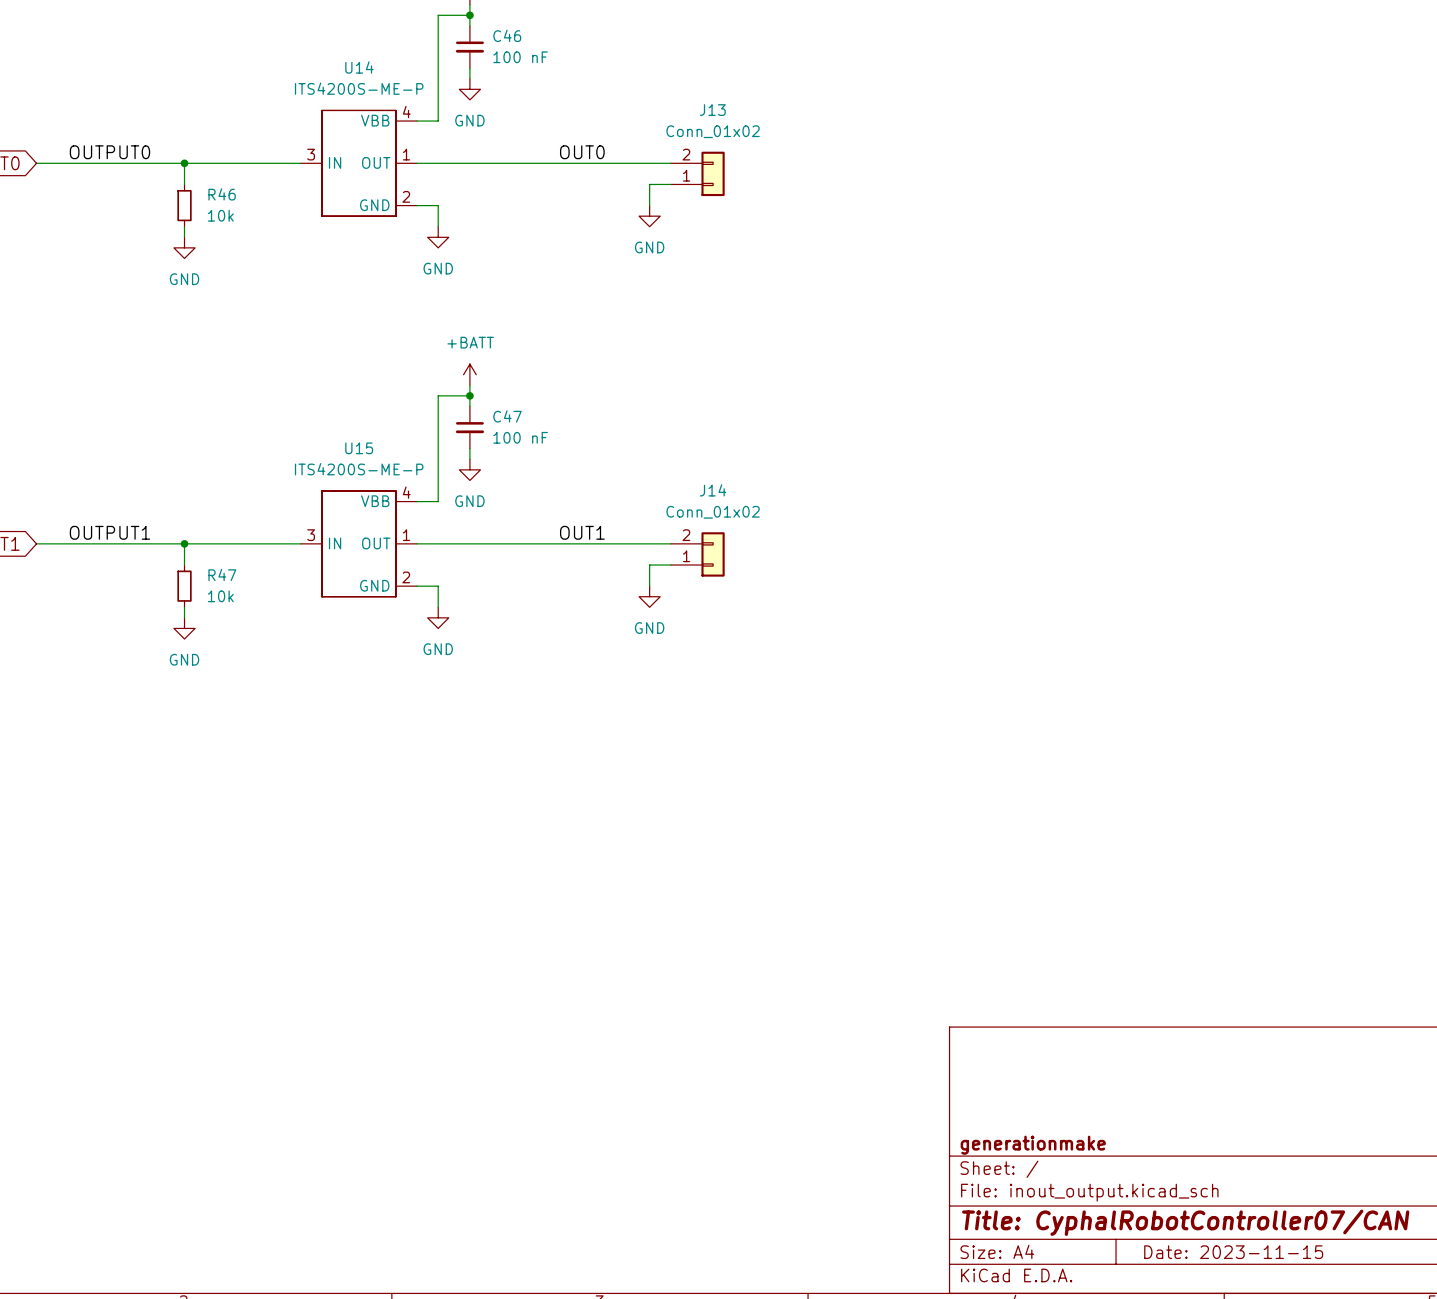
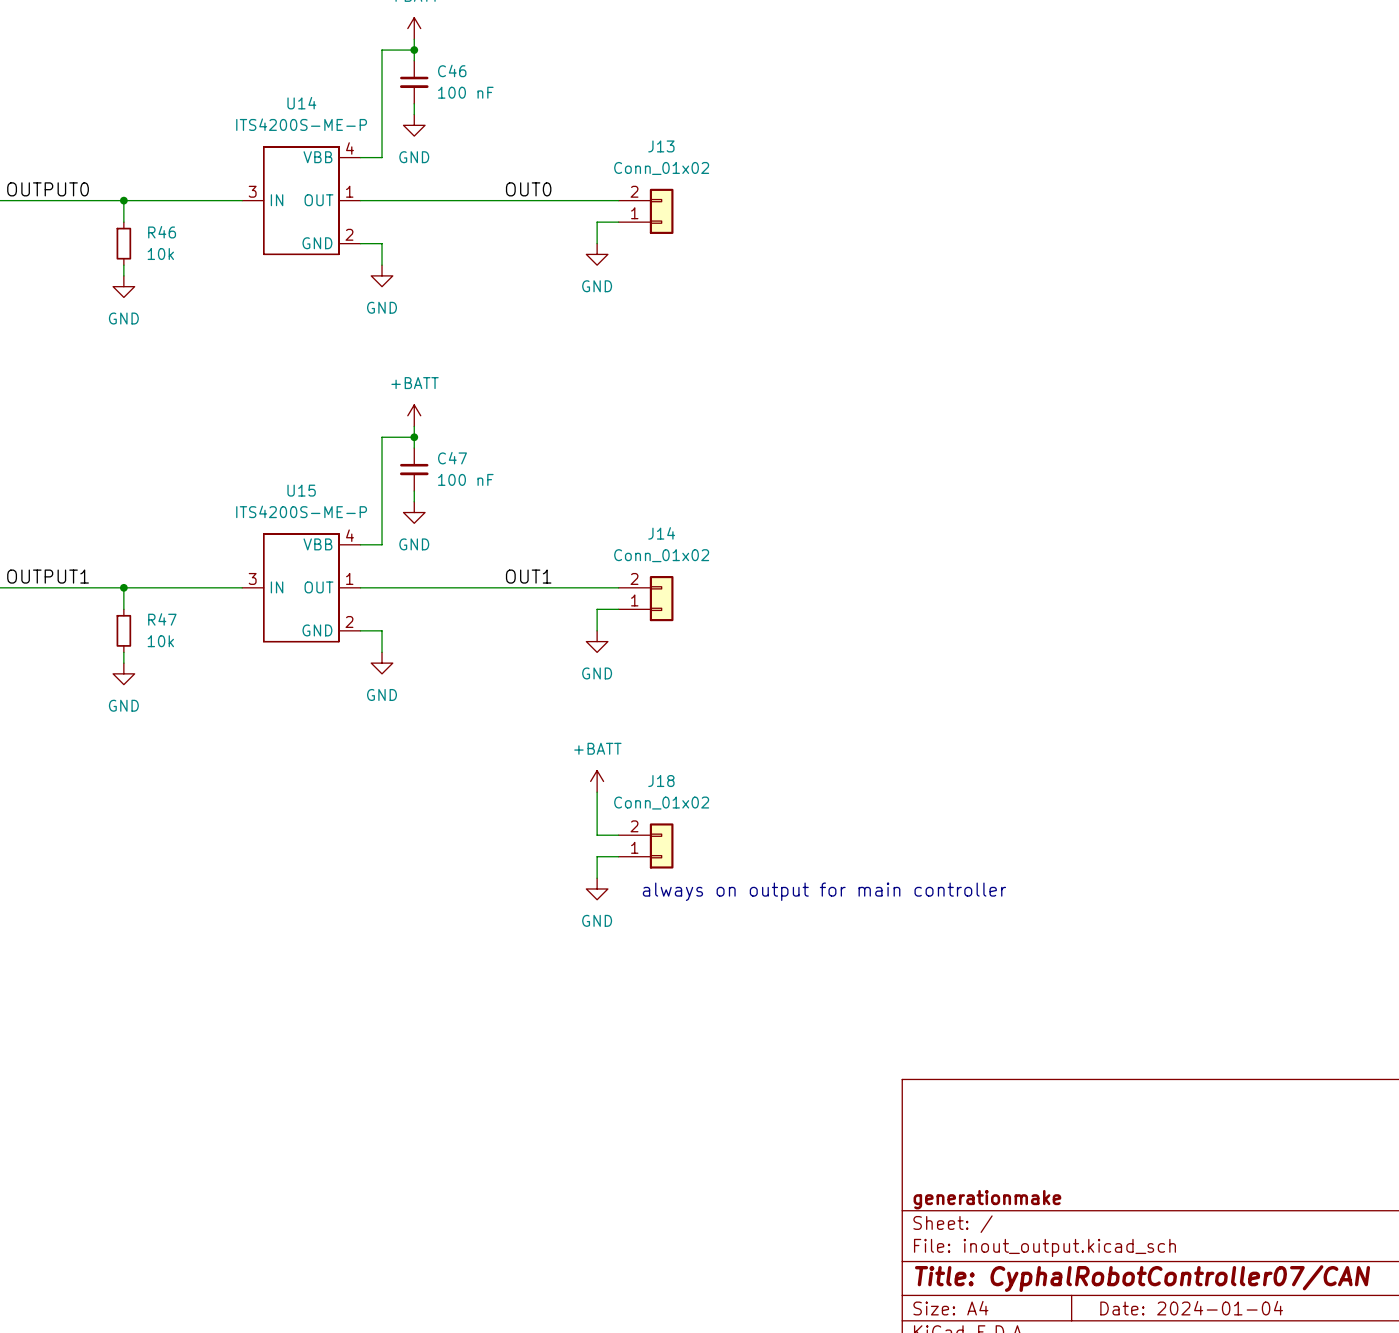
power symbol: none -> +BATT (597, 781)
wire: none -> (597, 792) (597, 835) (618, 835)
J18: none -> Conn_01x02 (646, 845)
wire: none -> (618, 856) (597, 856) (597, 878)
power symbol: none -> GND (597, 888)
text: none -> always on output for main controller (824, 891)
title block: Date: 2023-11-15 (1233, 1252) -> Date: 2024-01-04 (1191, 1308)

